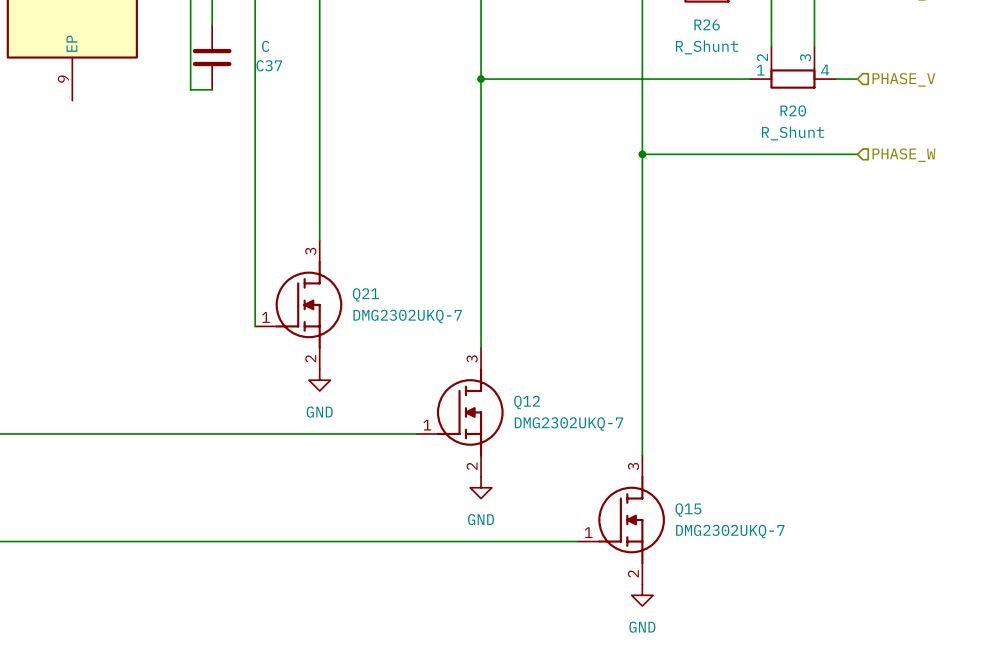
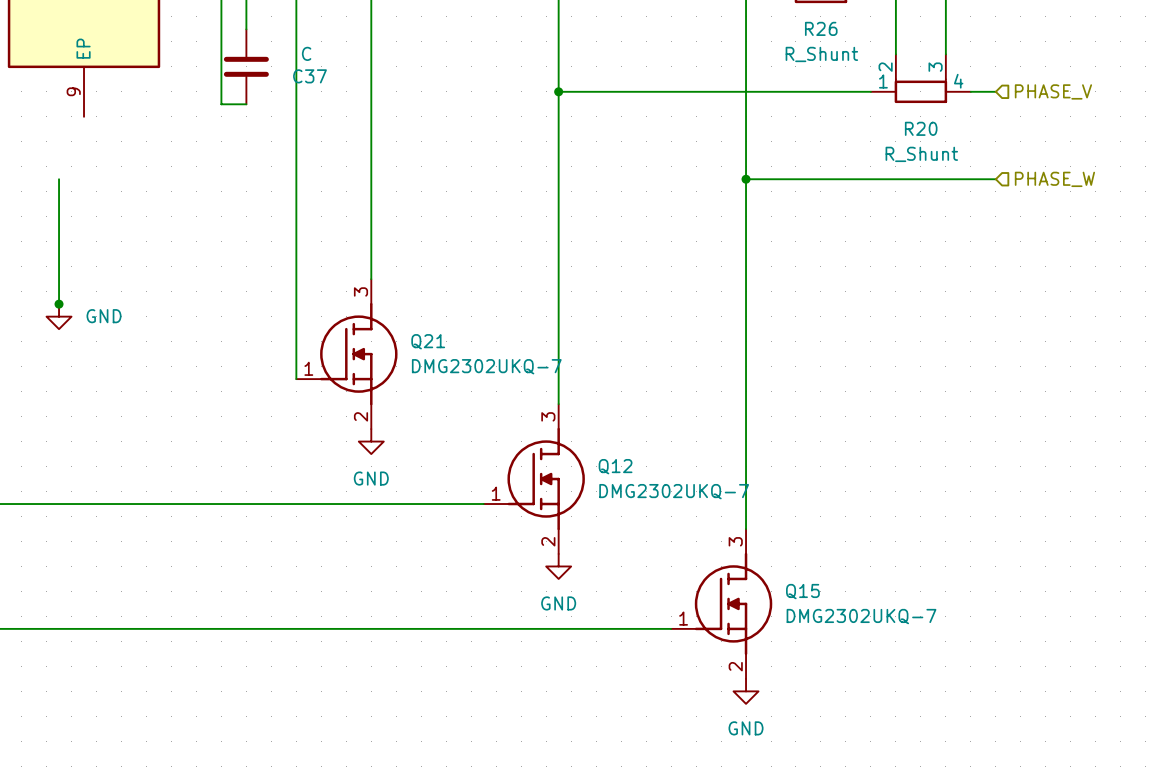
wire: none -> (59, 179) (59, 304)
junction: none -> (59, 304)
power symbol: none -> GND (59, 316)

